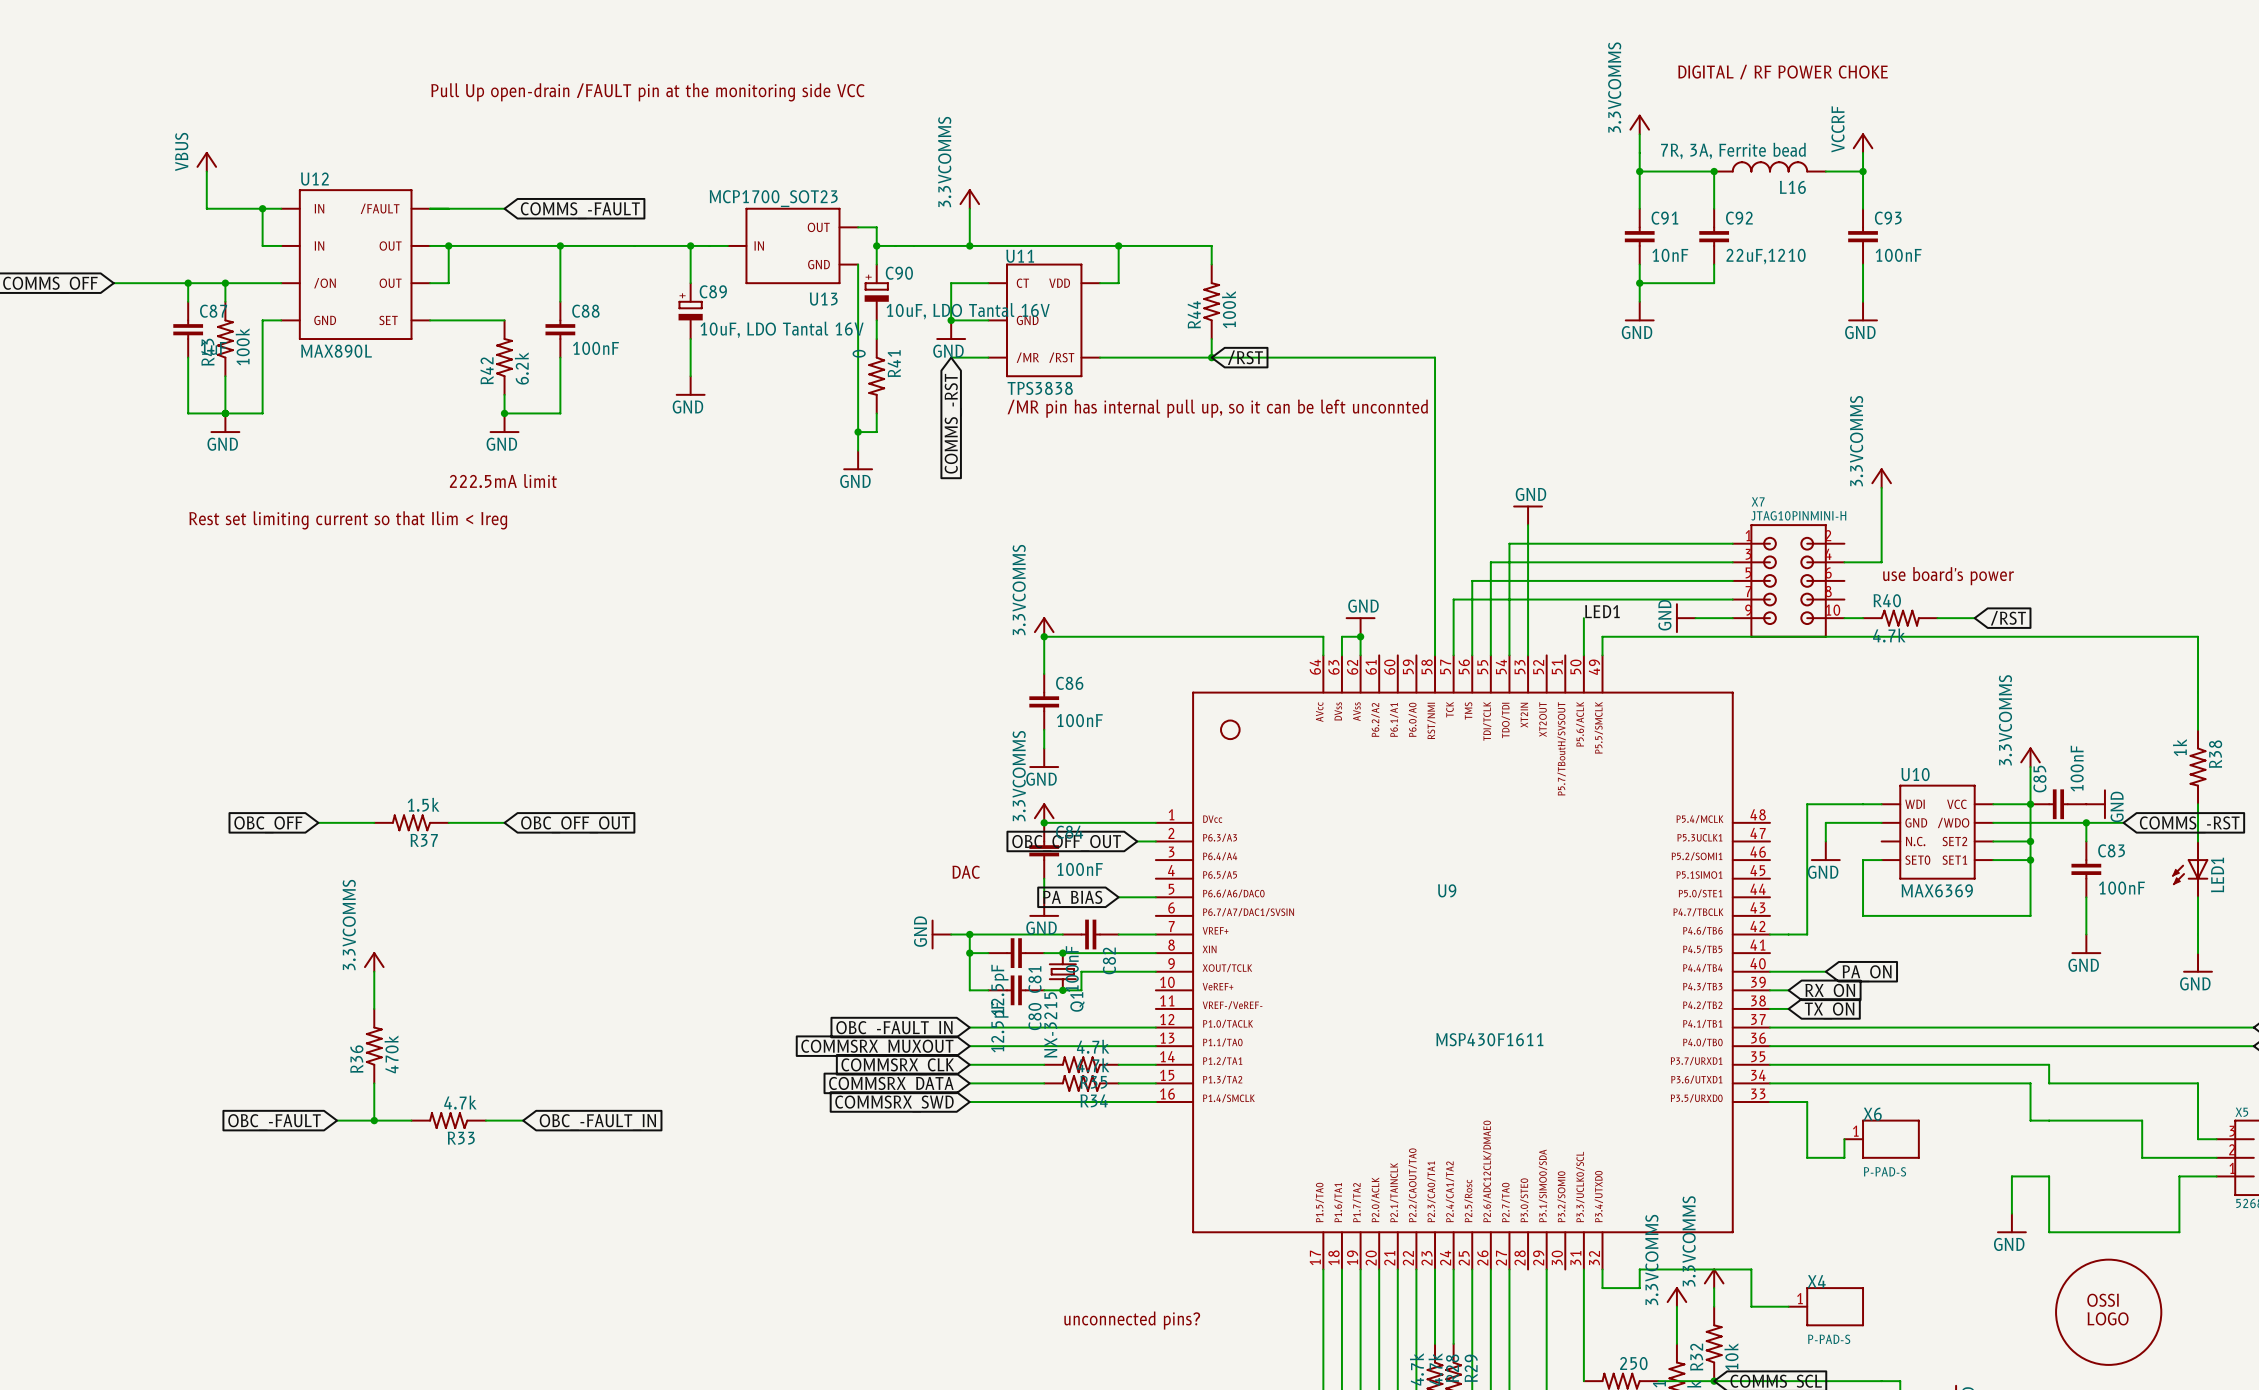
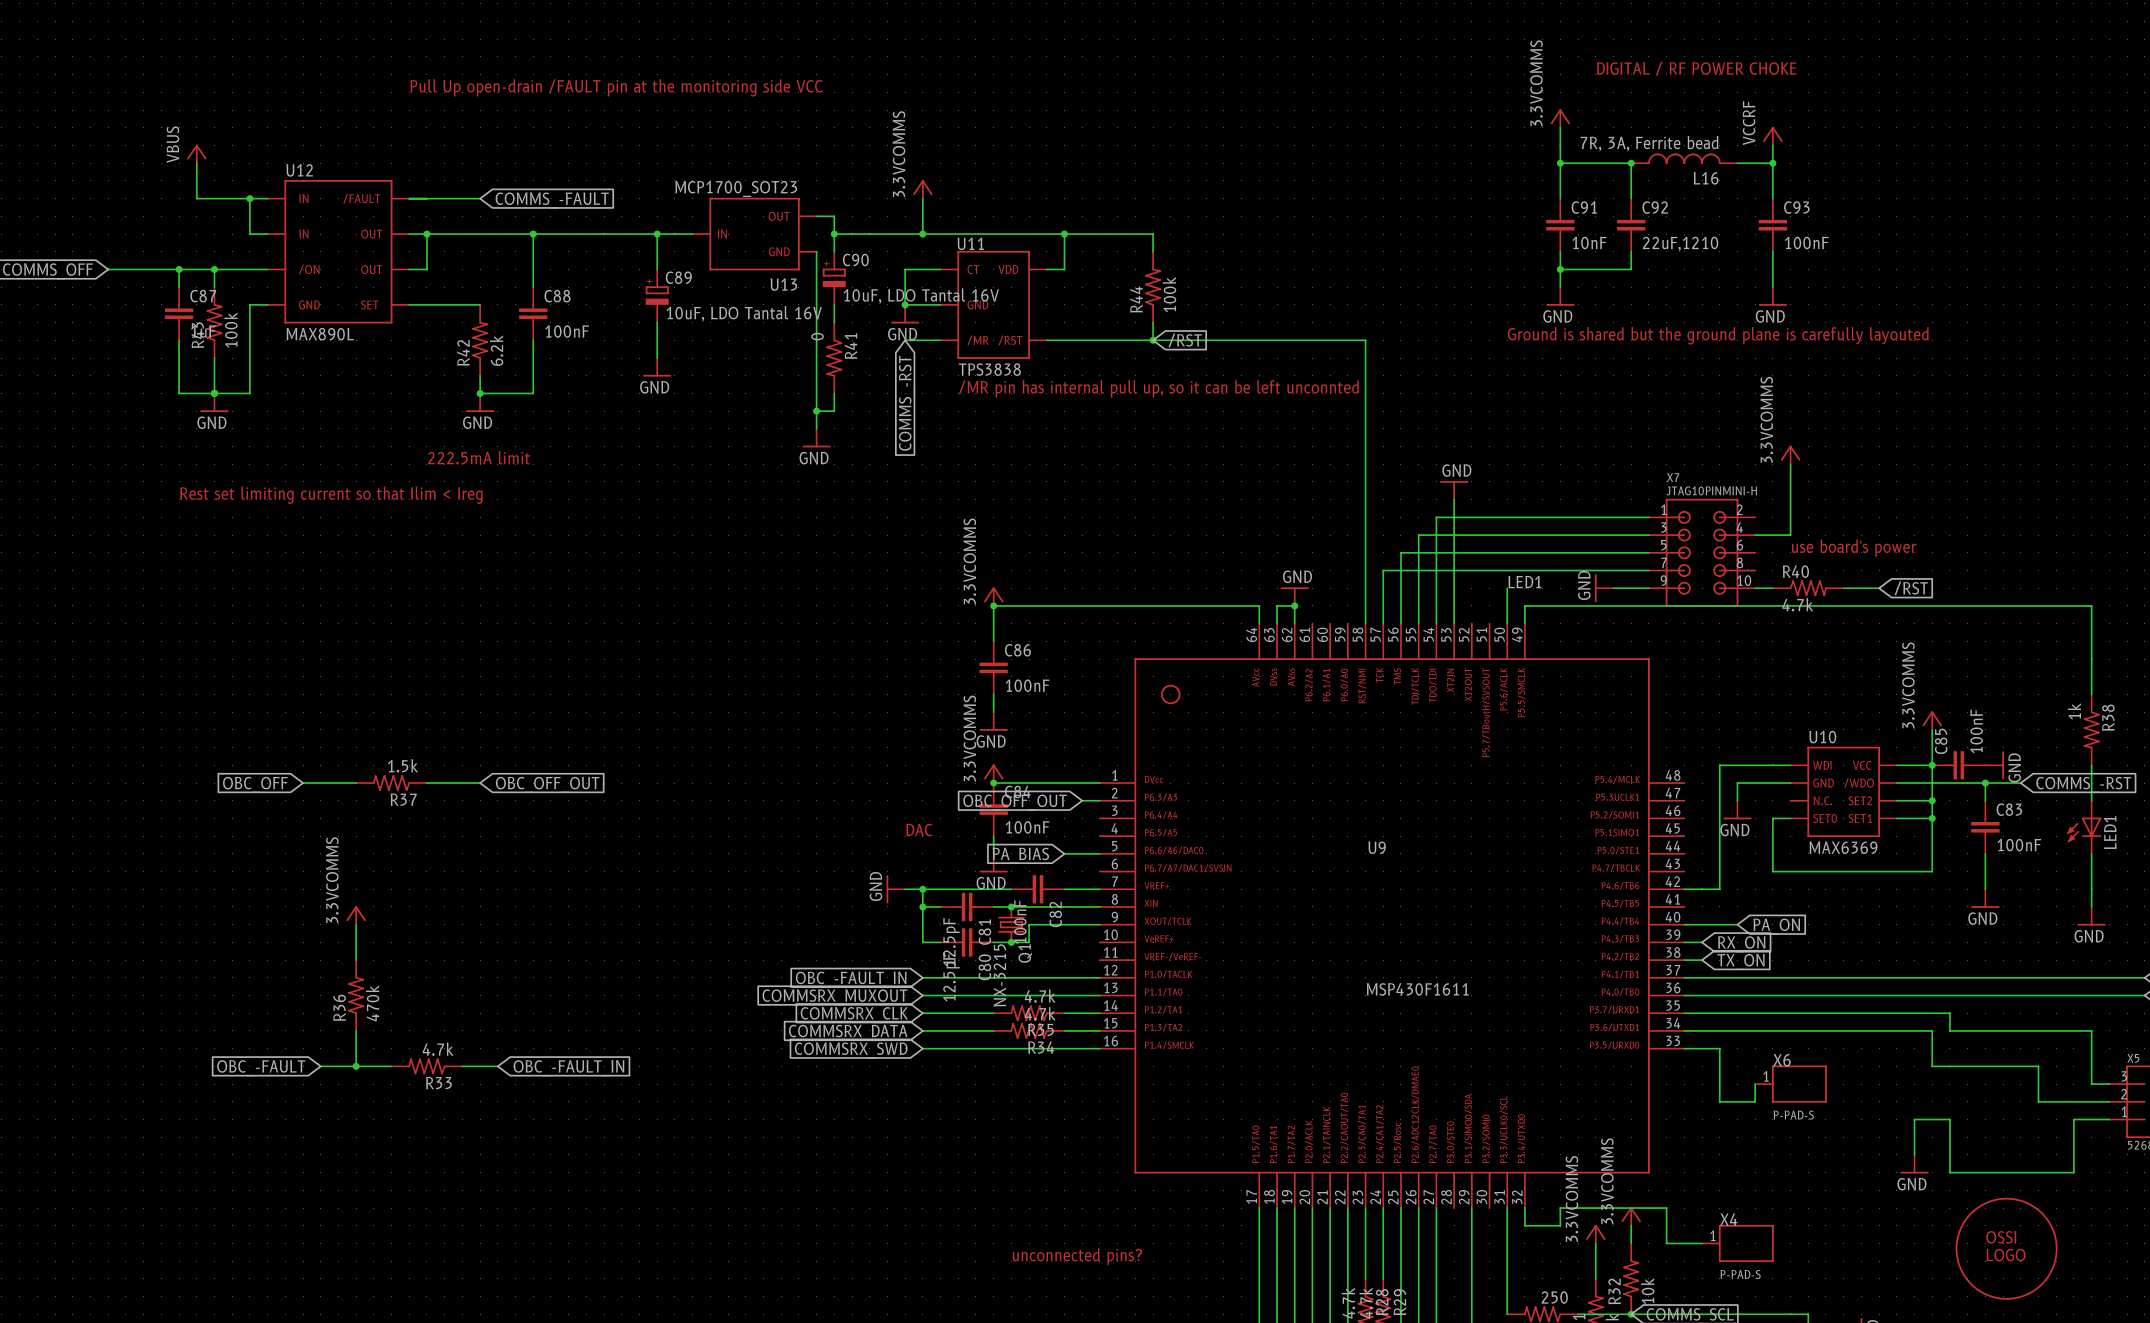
text: none -> Ground is shared but the ground plane is carefully layouted (1718, 335)

